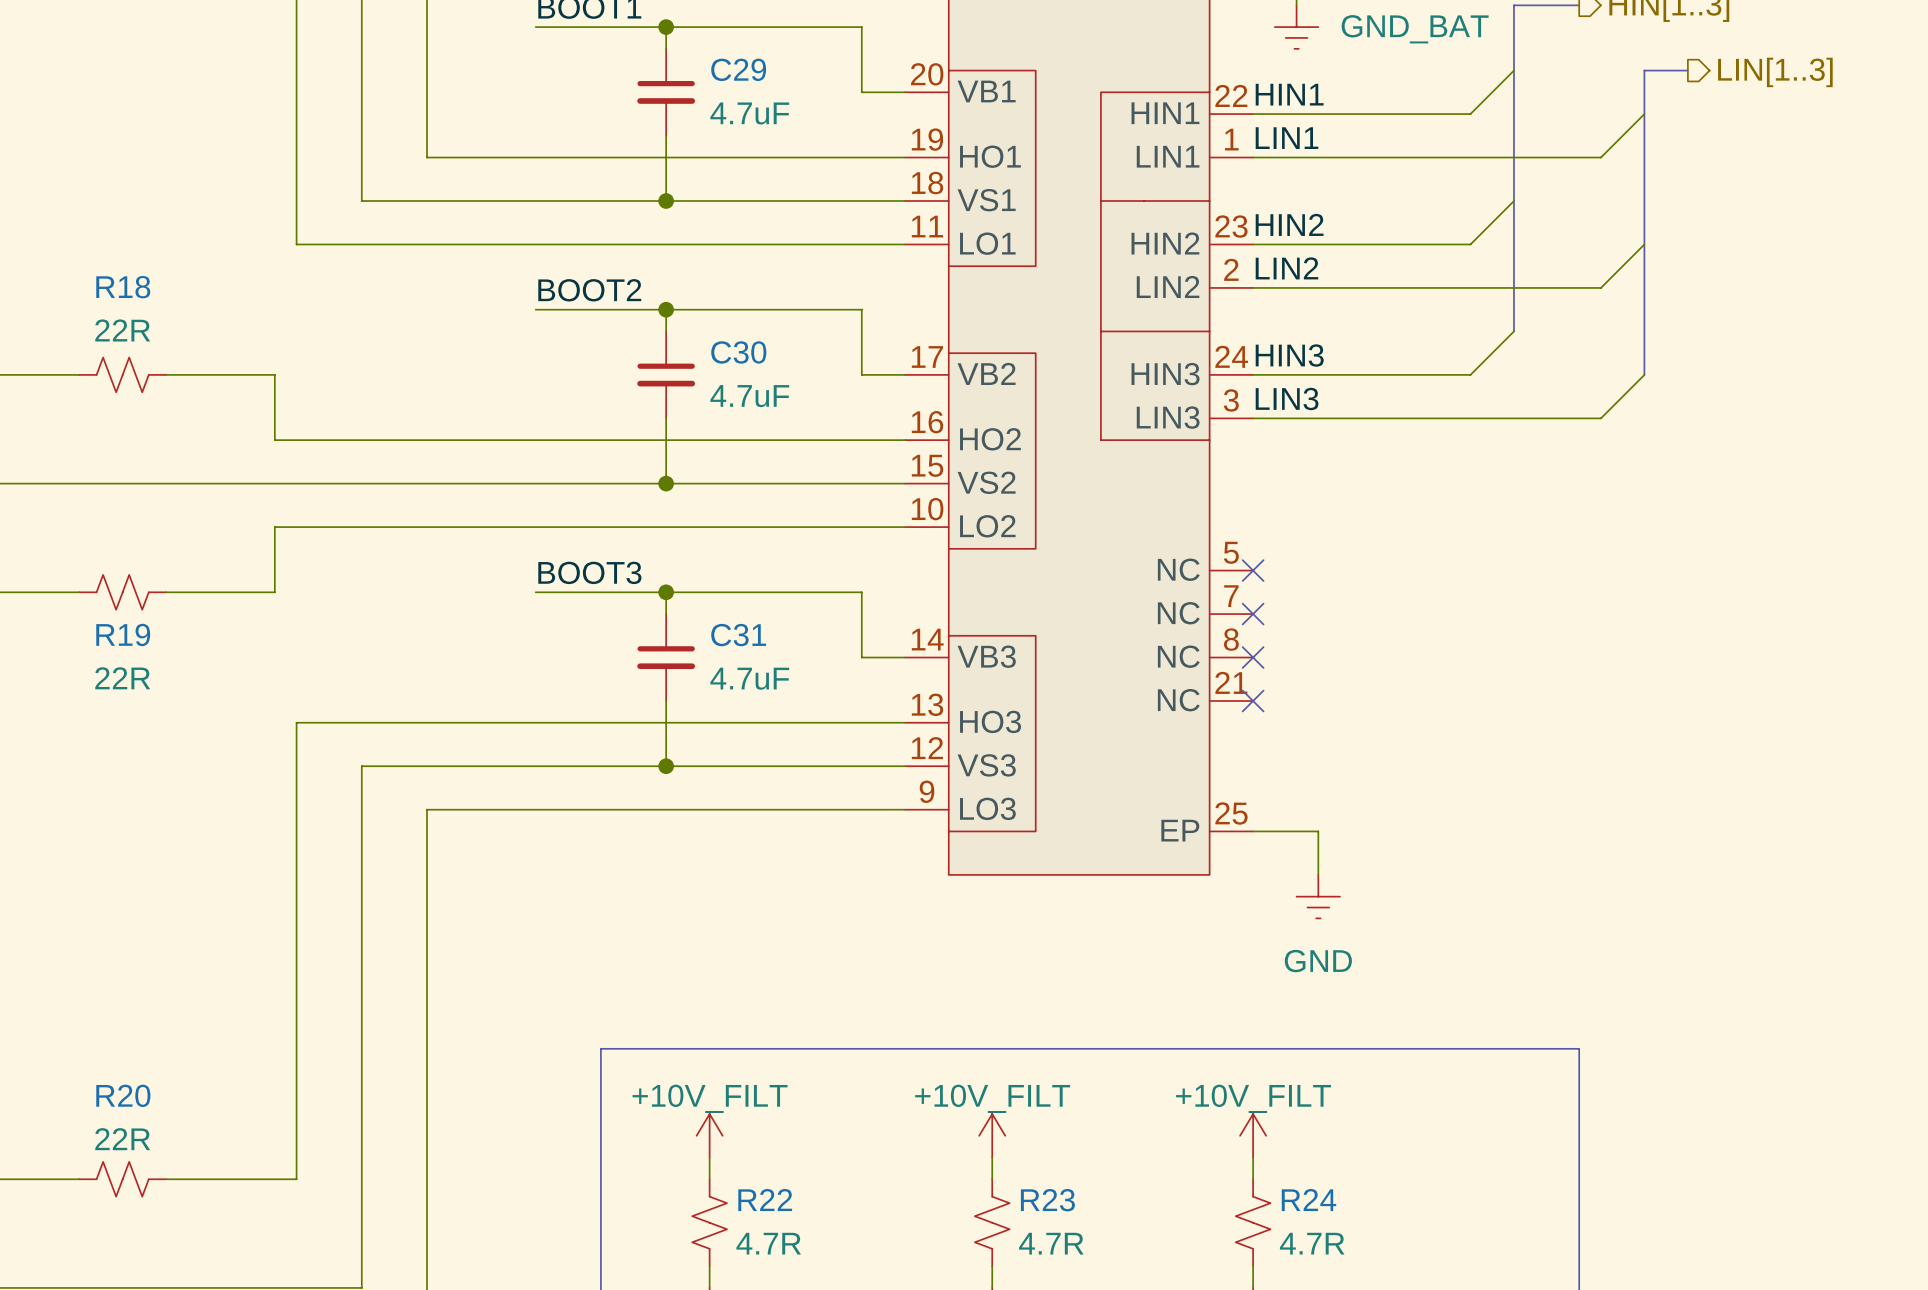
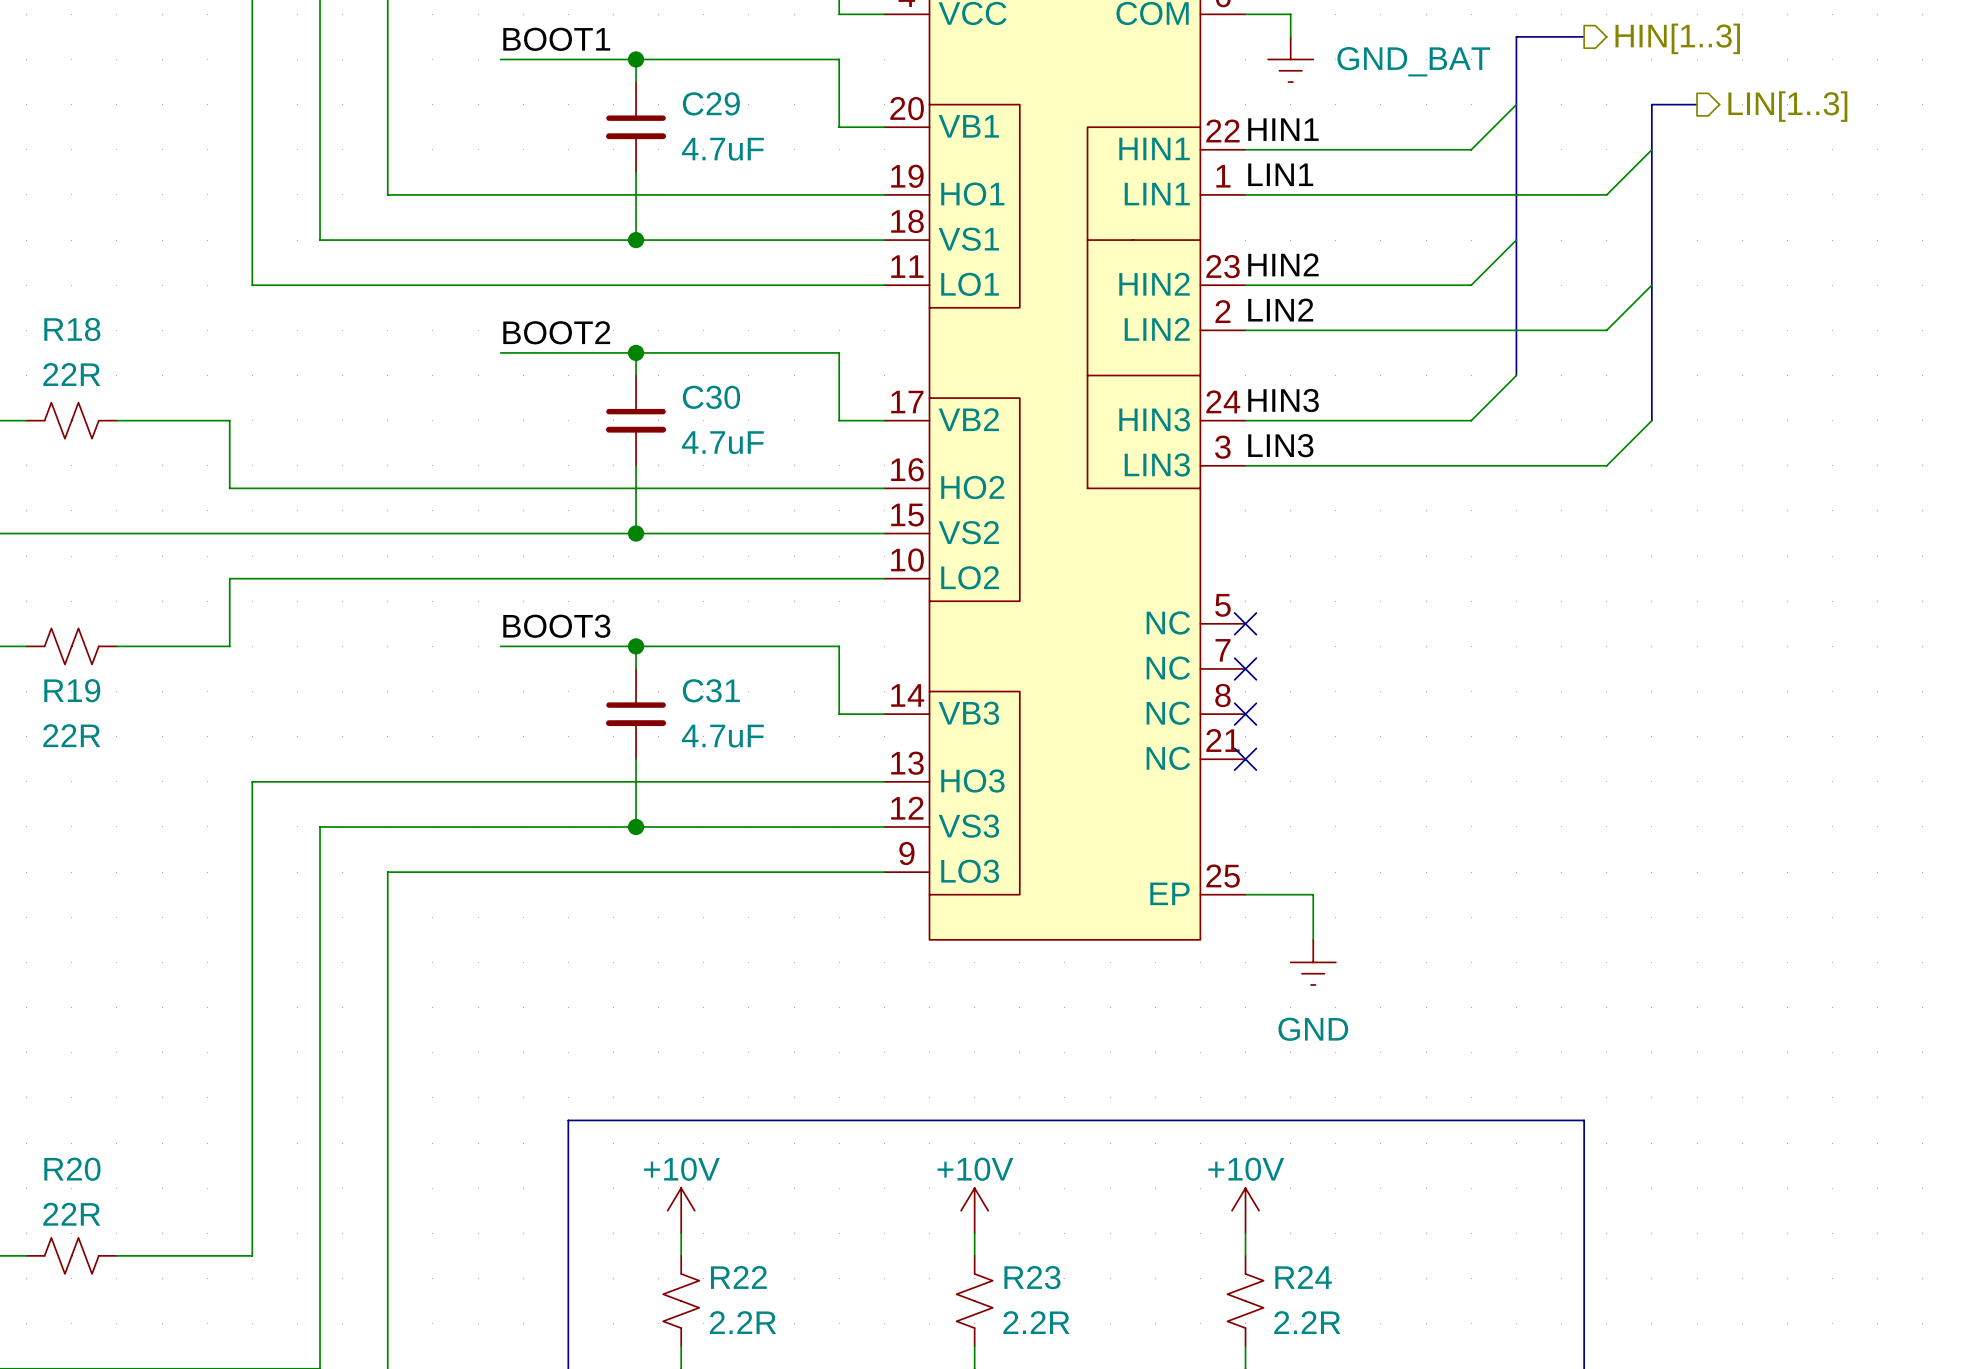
power symbol: +10V_FILT (709, 1135) -> +10V (681, 1210)
power symbol: +10V_FILT (992, 1135) -> +10V (974, 1210)
power symbol: +10V_FILT (1253, 1135) -> +10V (1245, 1210)
R22 value: 4.7R (768, 1243) -> 2.2R (743, 1322)
R23 value: 4.7R (1051, 1243) -> 2.2R (1036, 1322)
R24 value: 4.7R (1312, 1243) -> 2.2R (1307, 1322)

